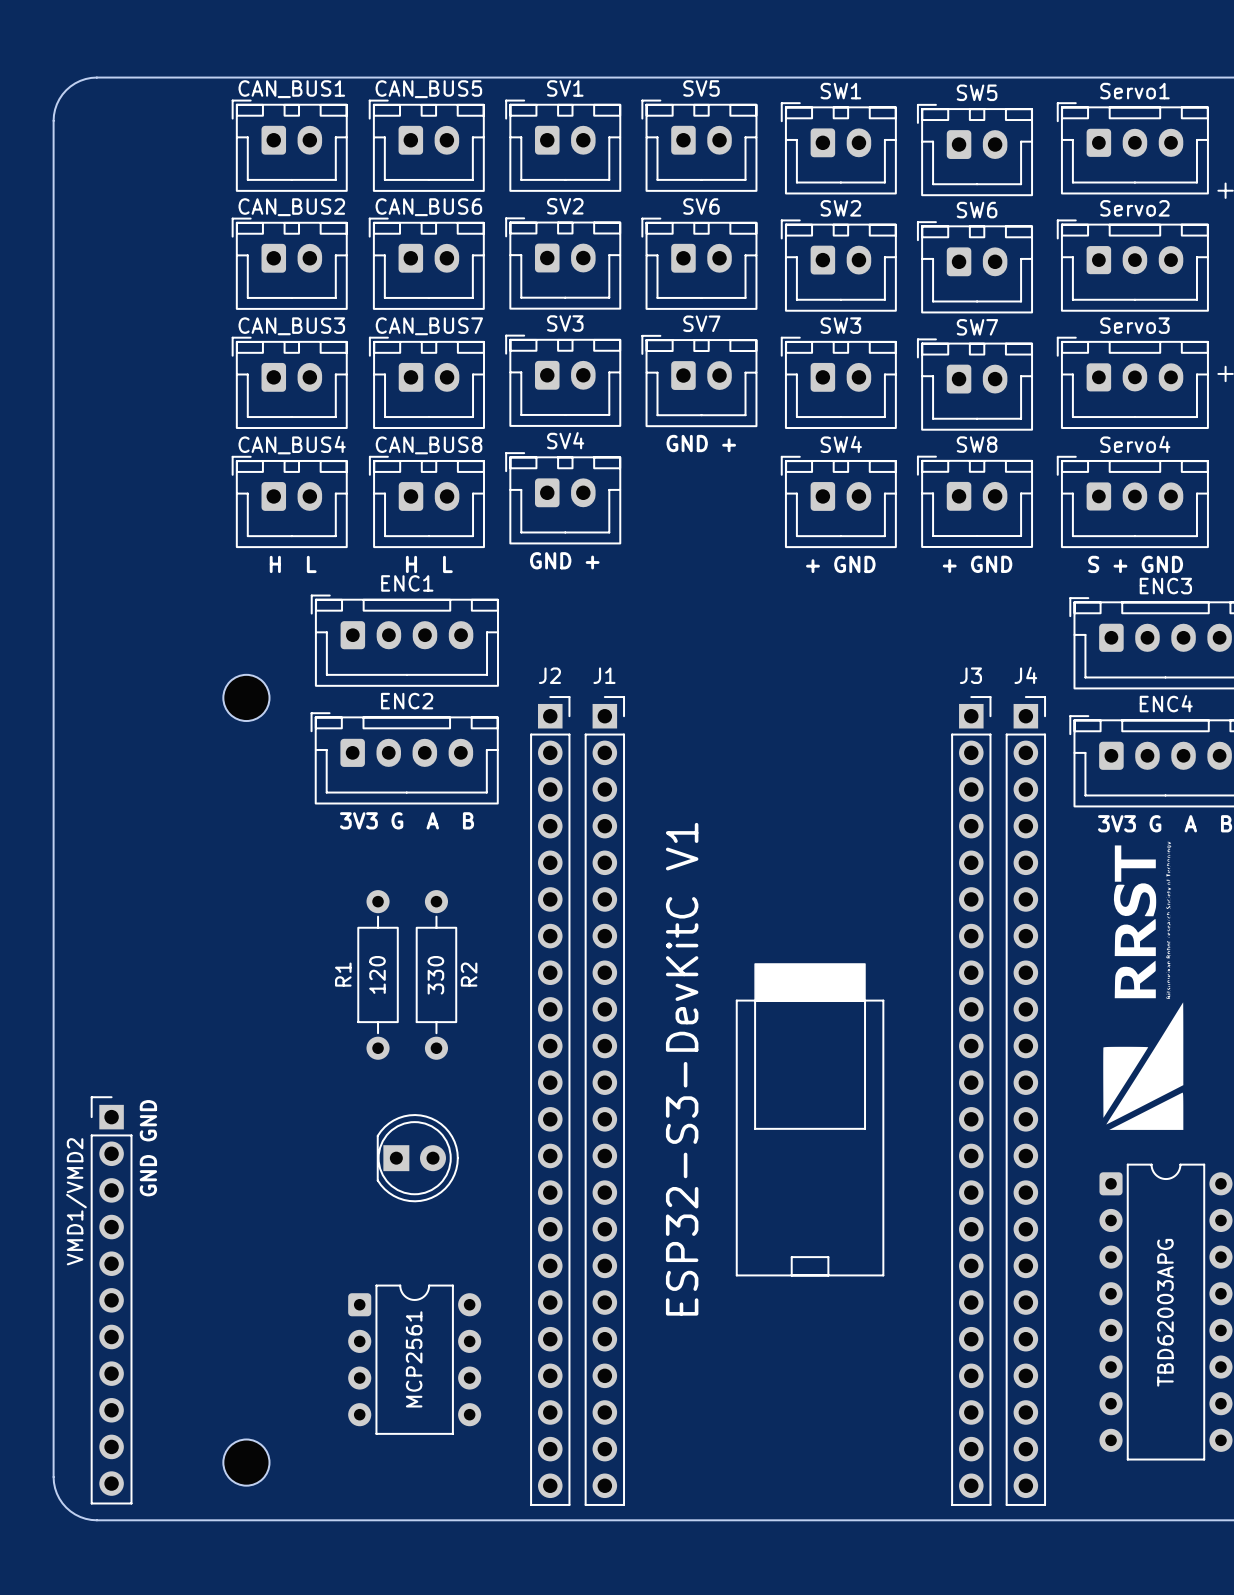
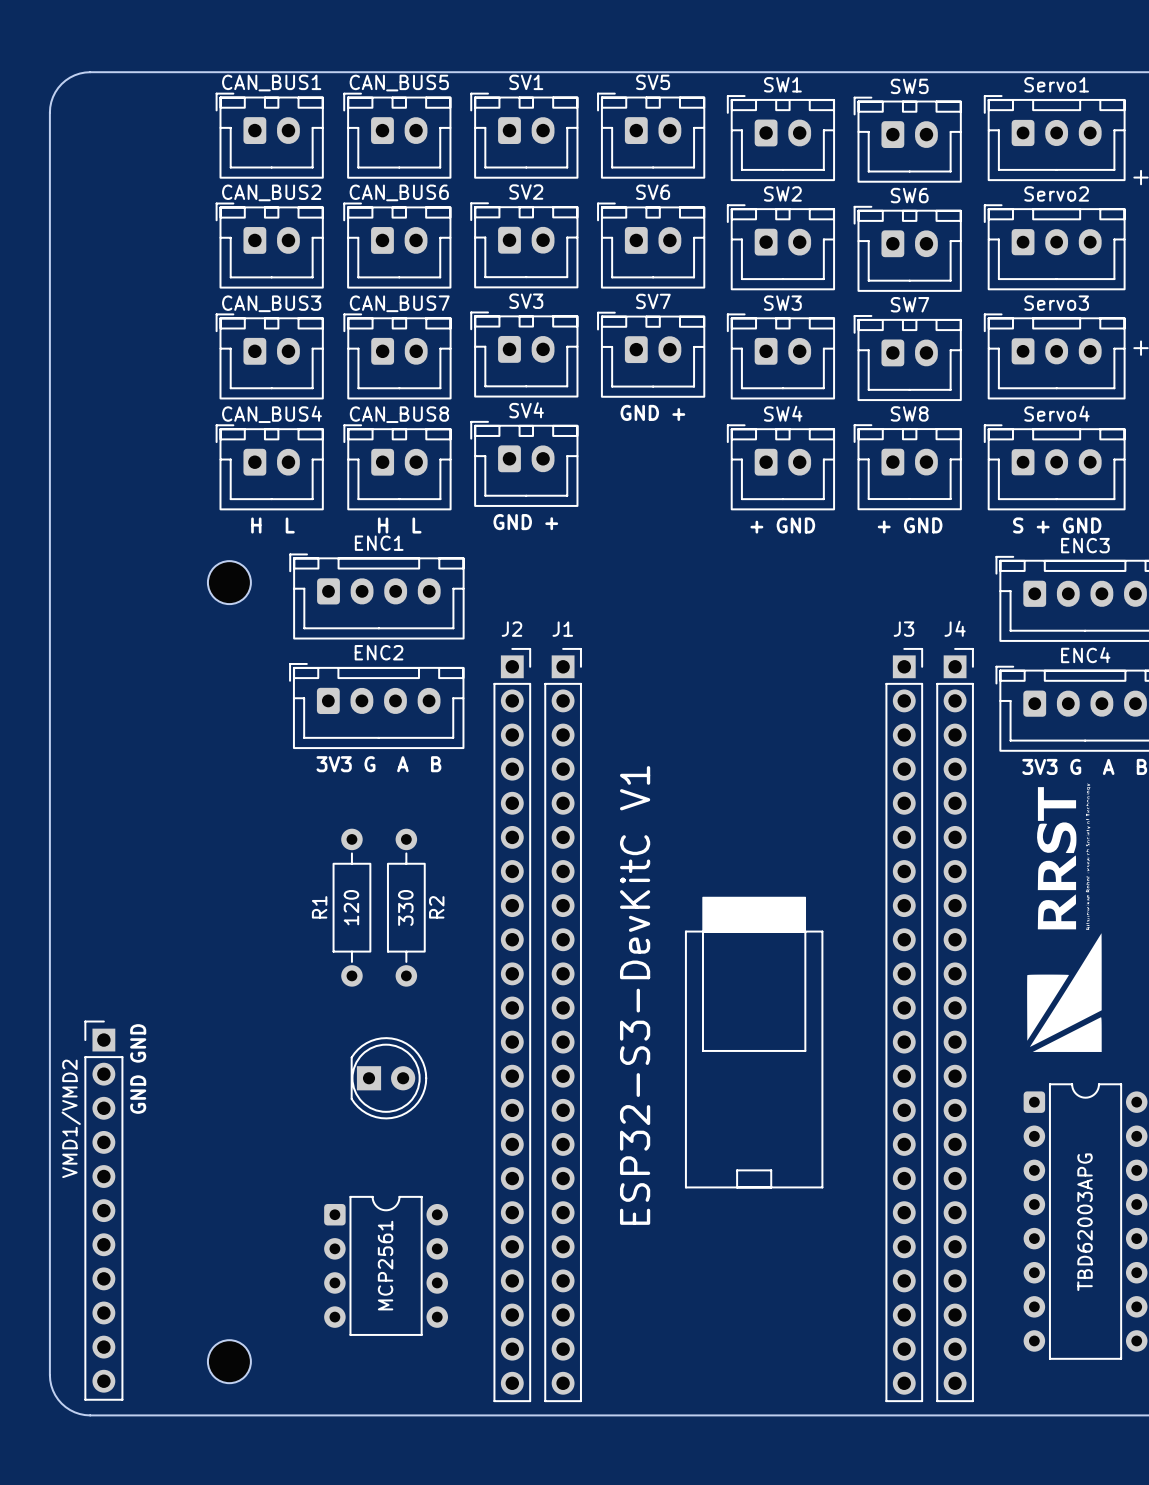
part position: (246, 697) -> (229, 582)

